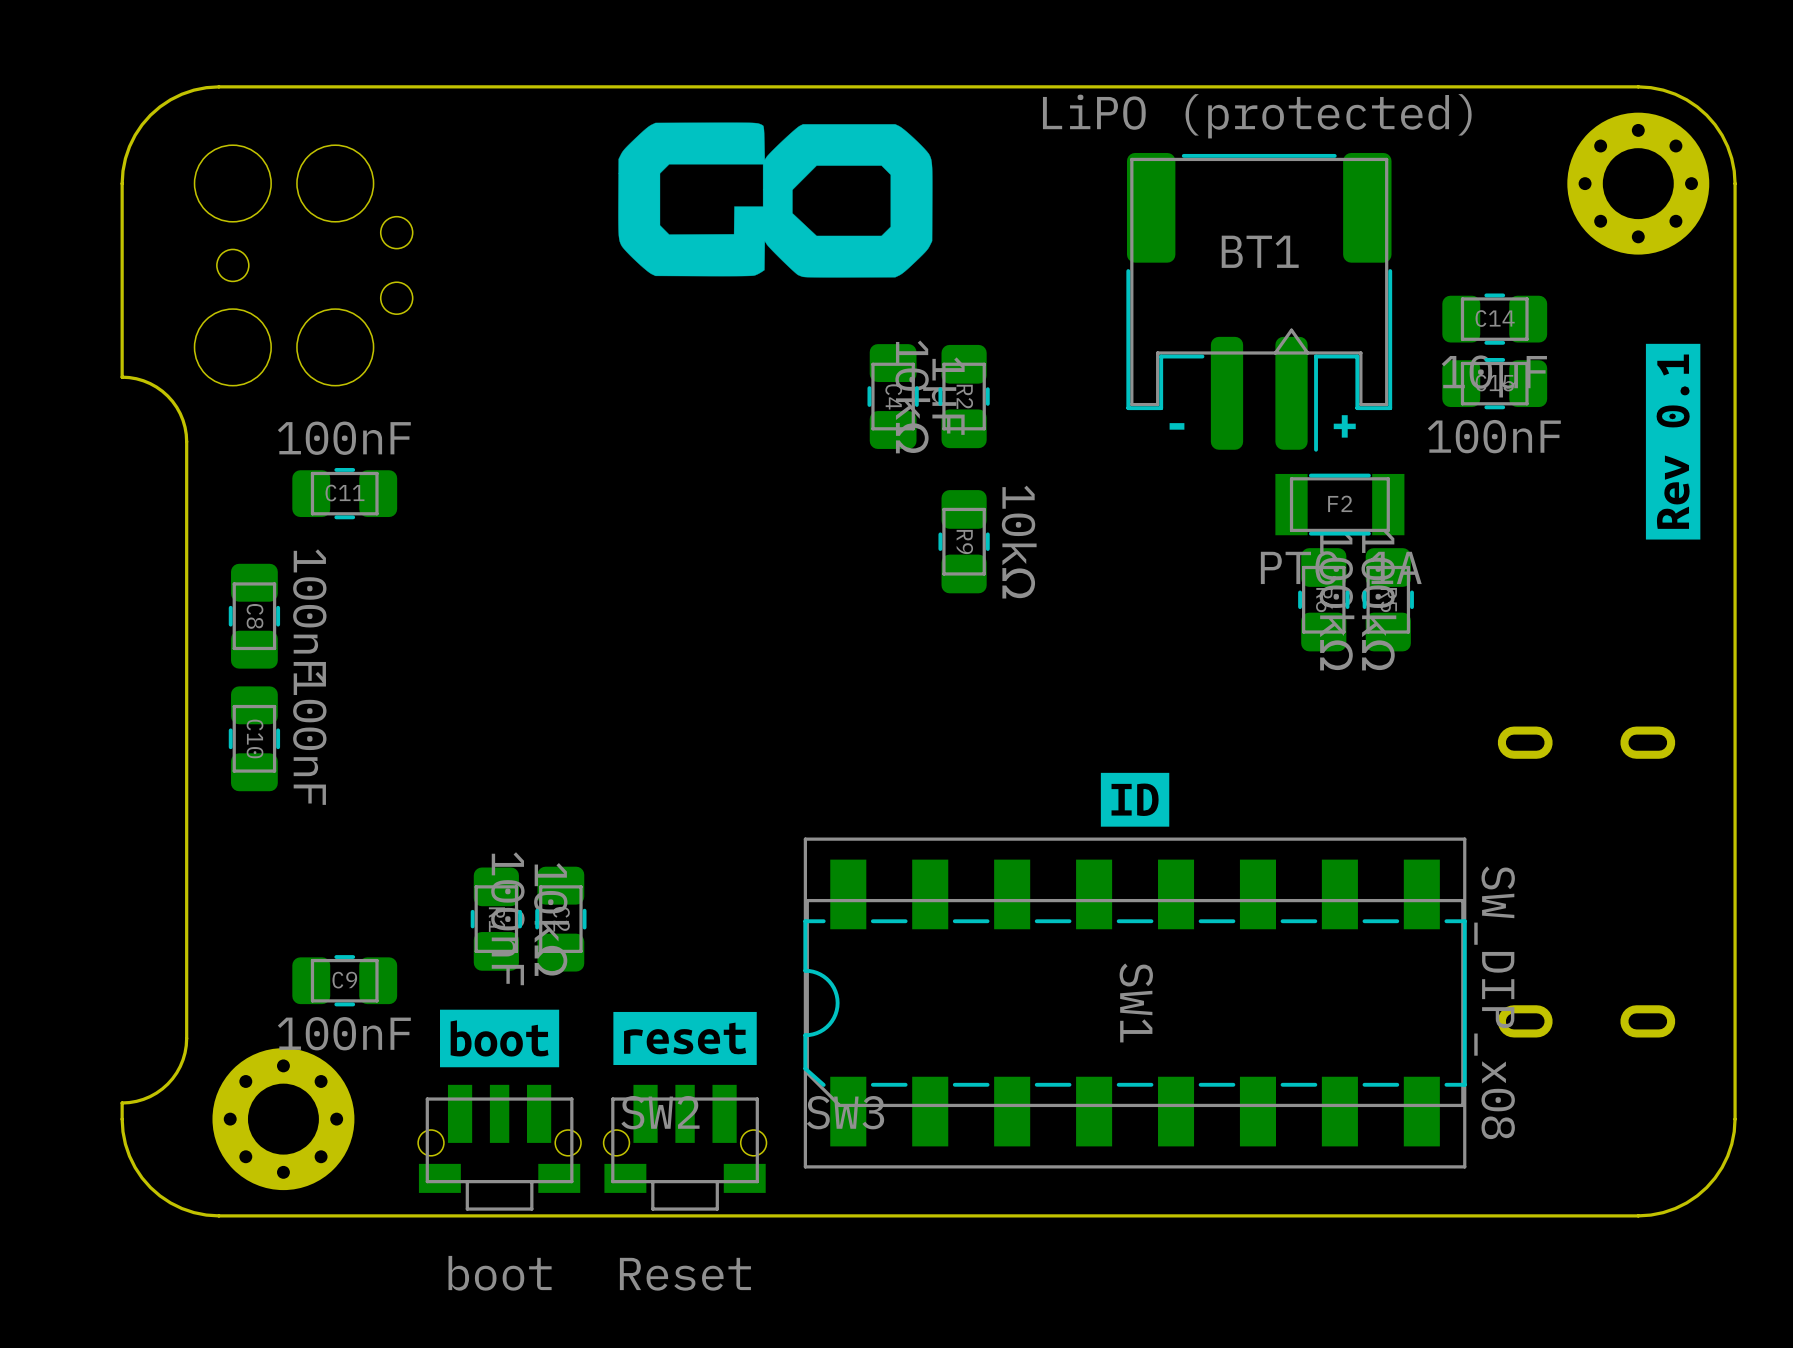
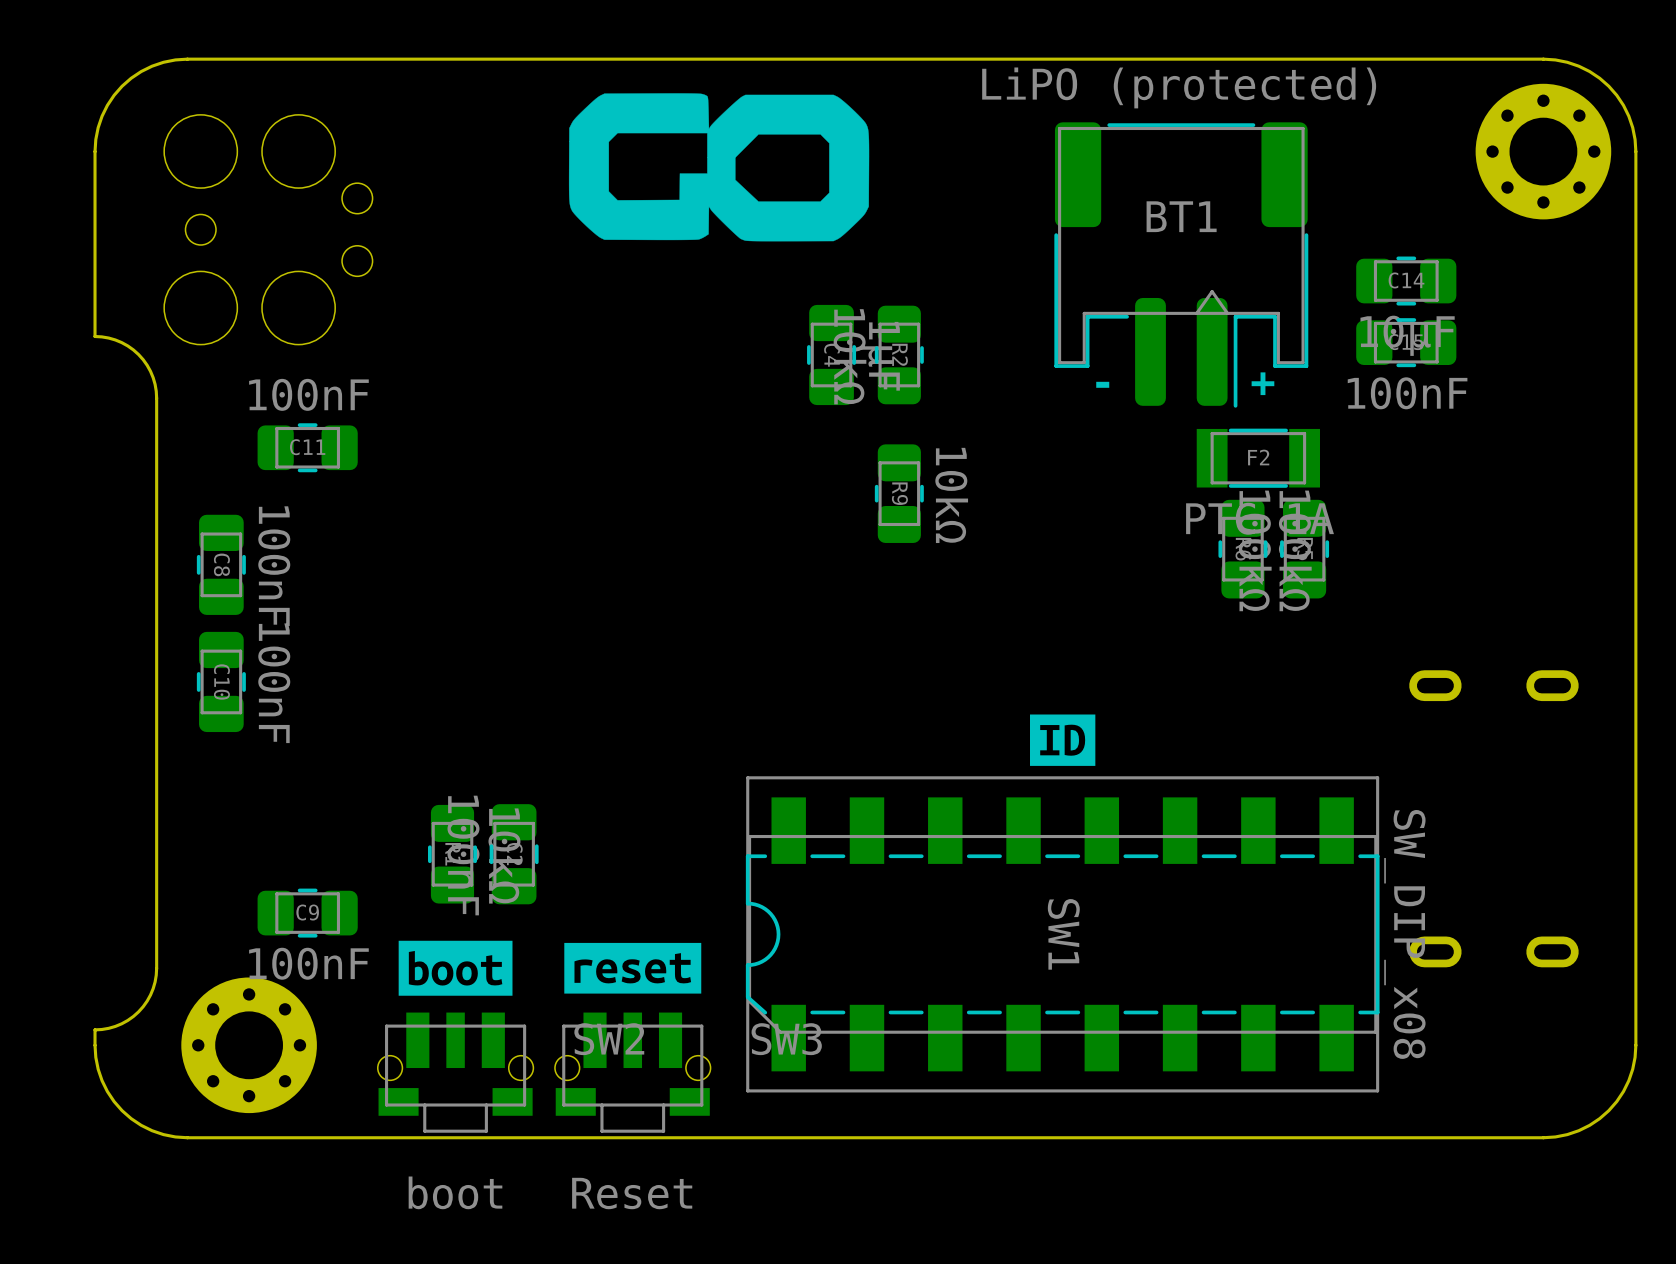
drawing: [1645, 343, 1701, 540] -> none

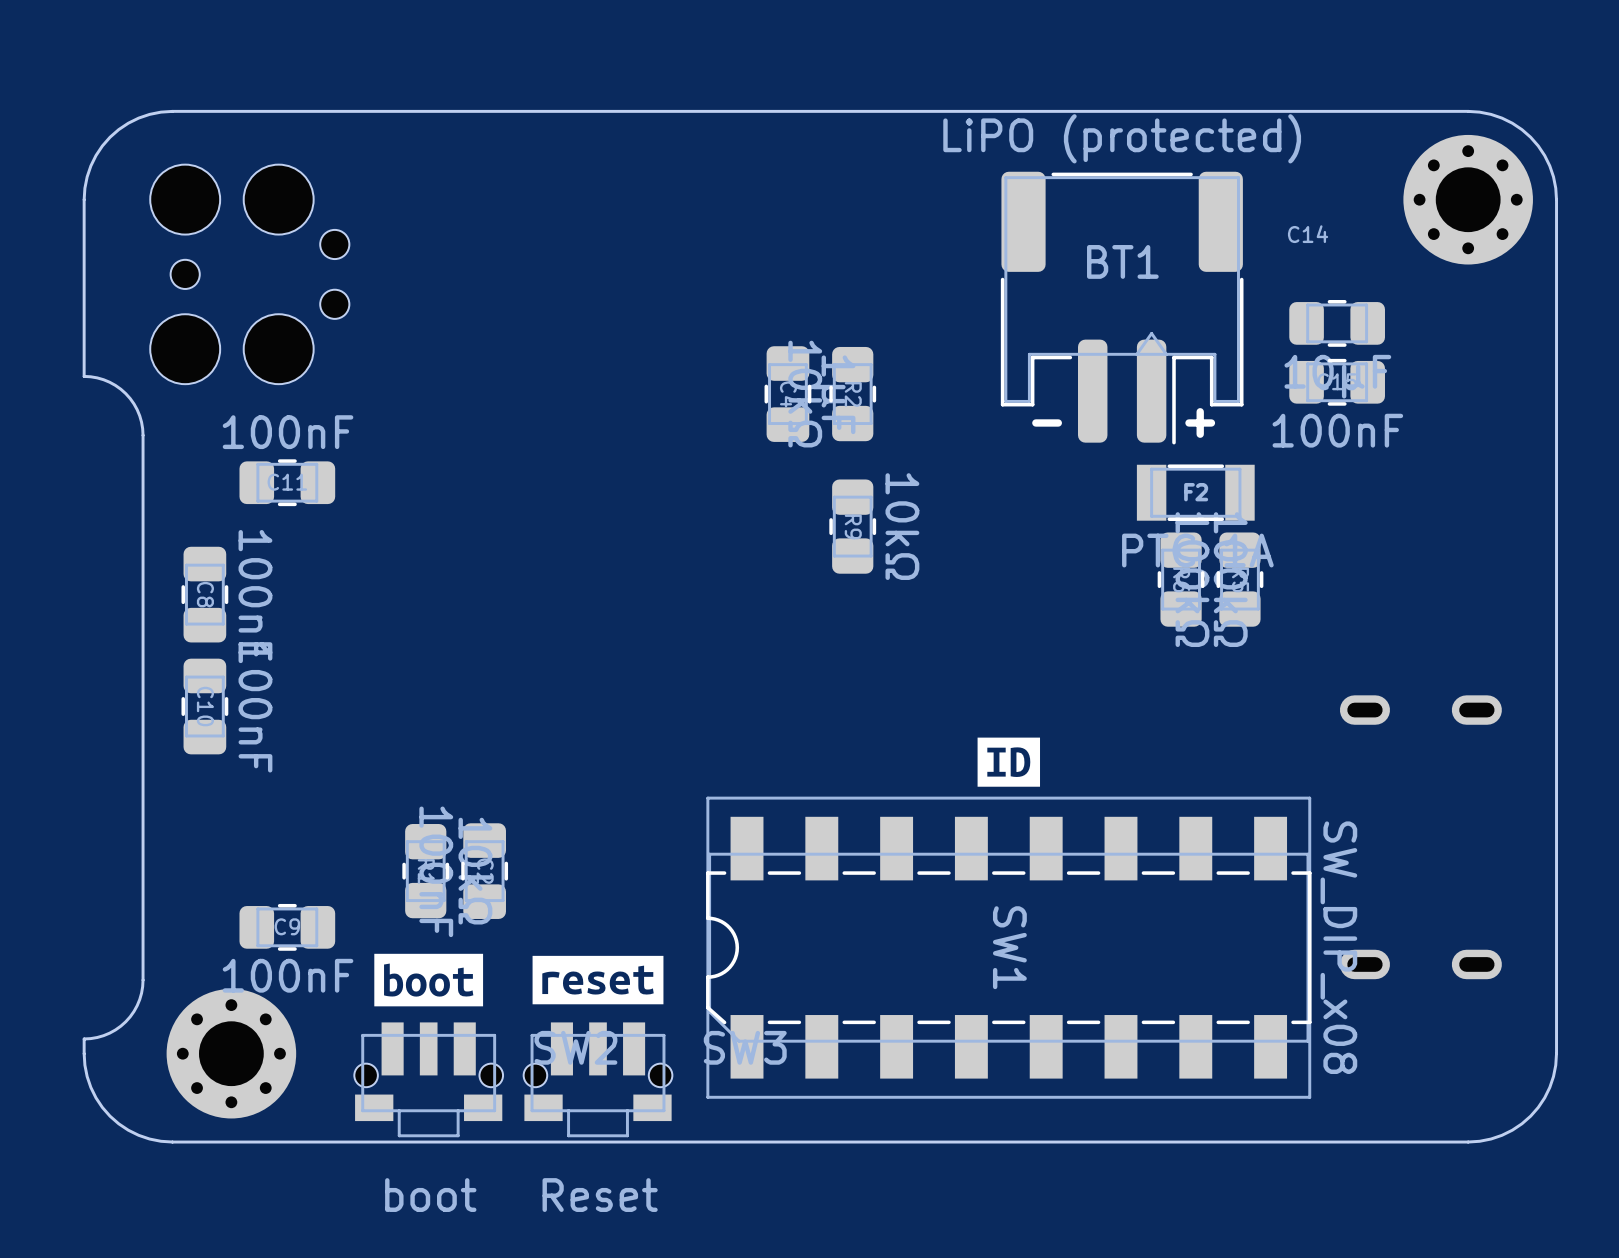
drawing: [568, 93, 870, 242] -> none
C14 name position: C14 (1406, 280) -> C14 (1308, 234)

